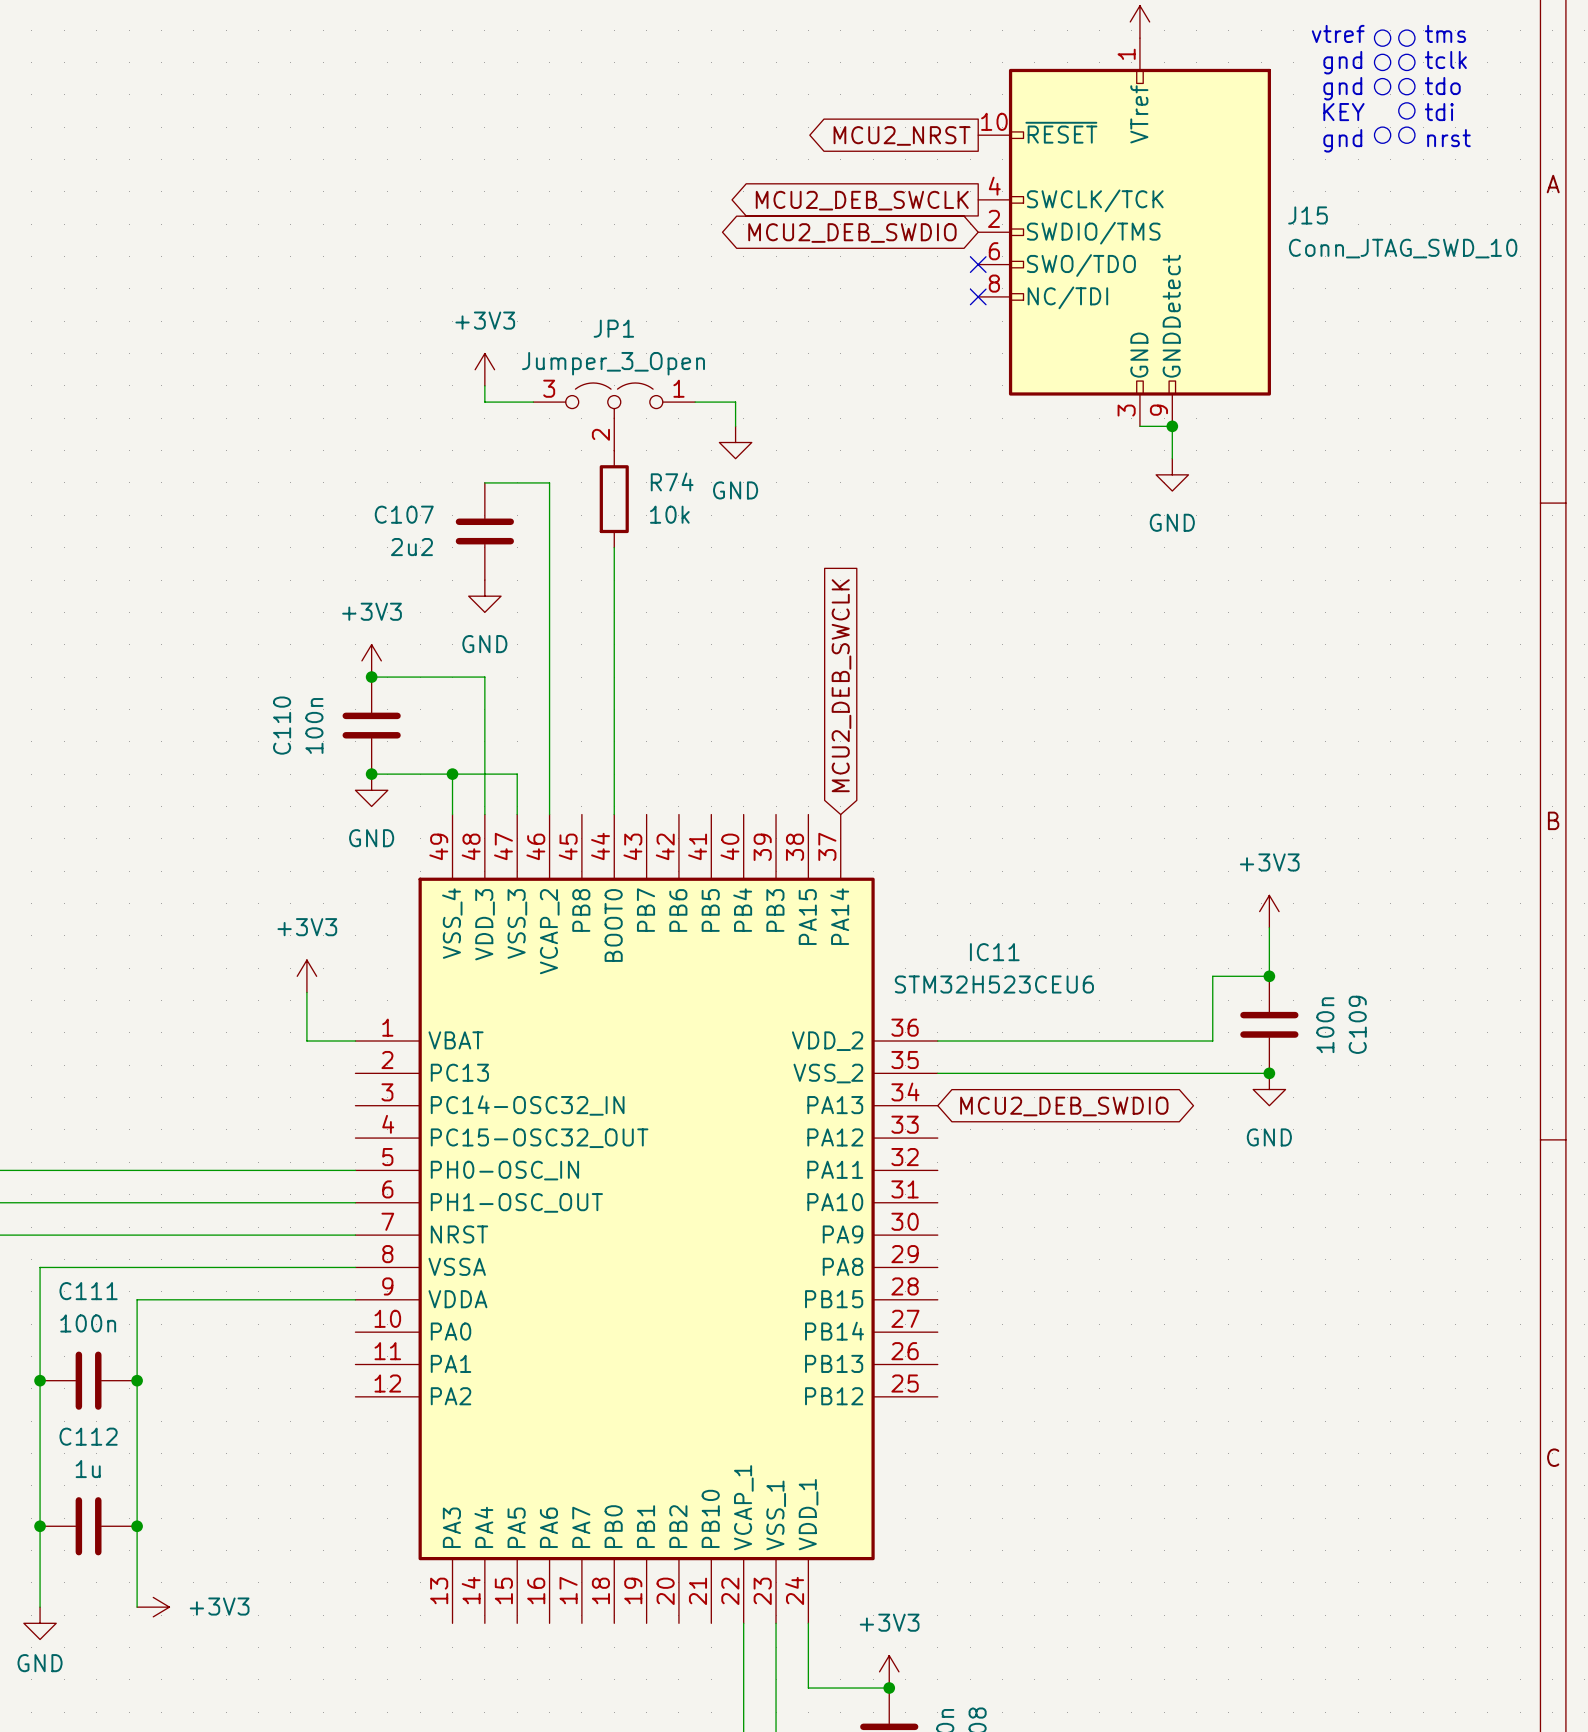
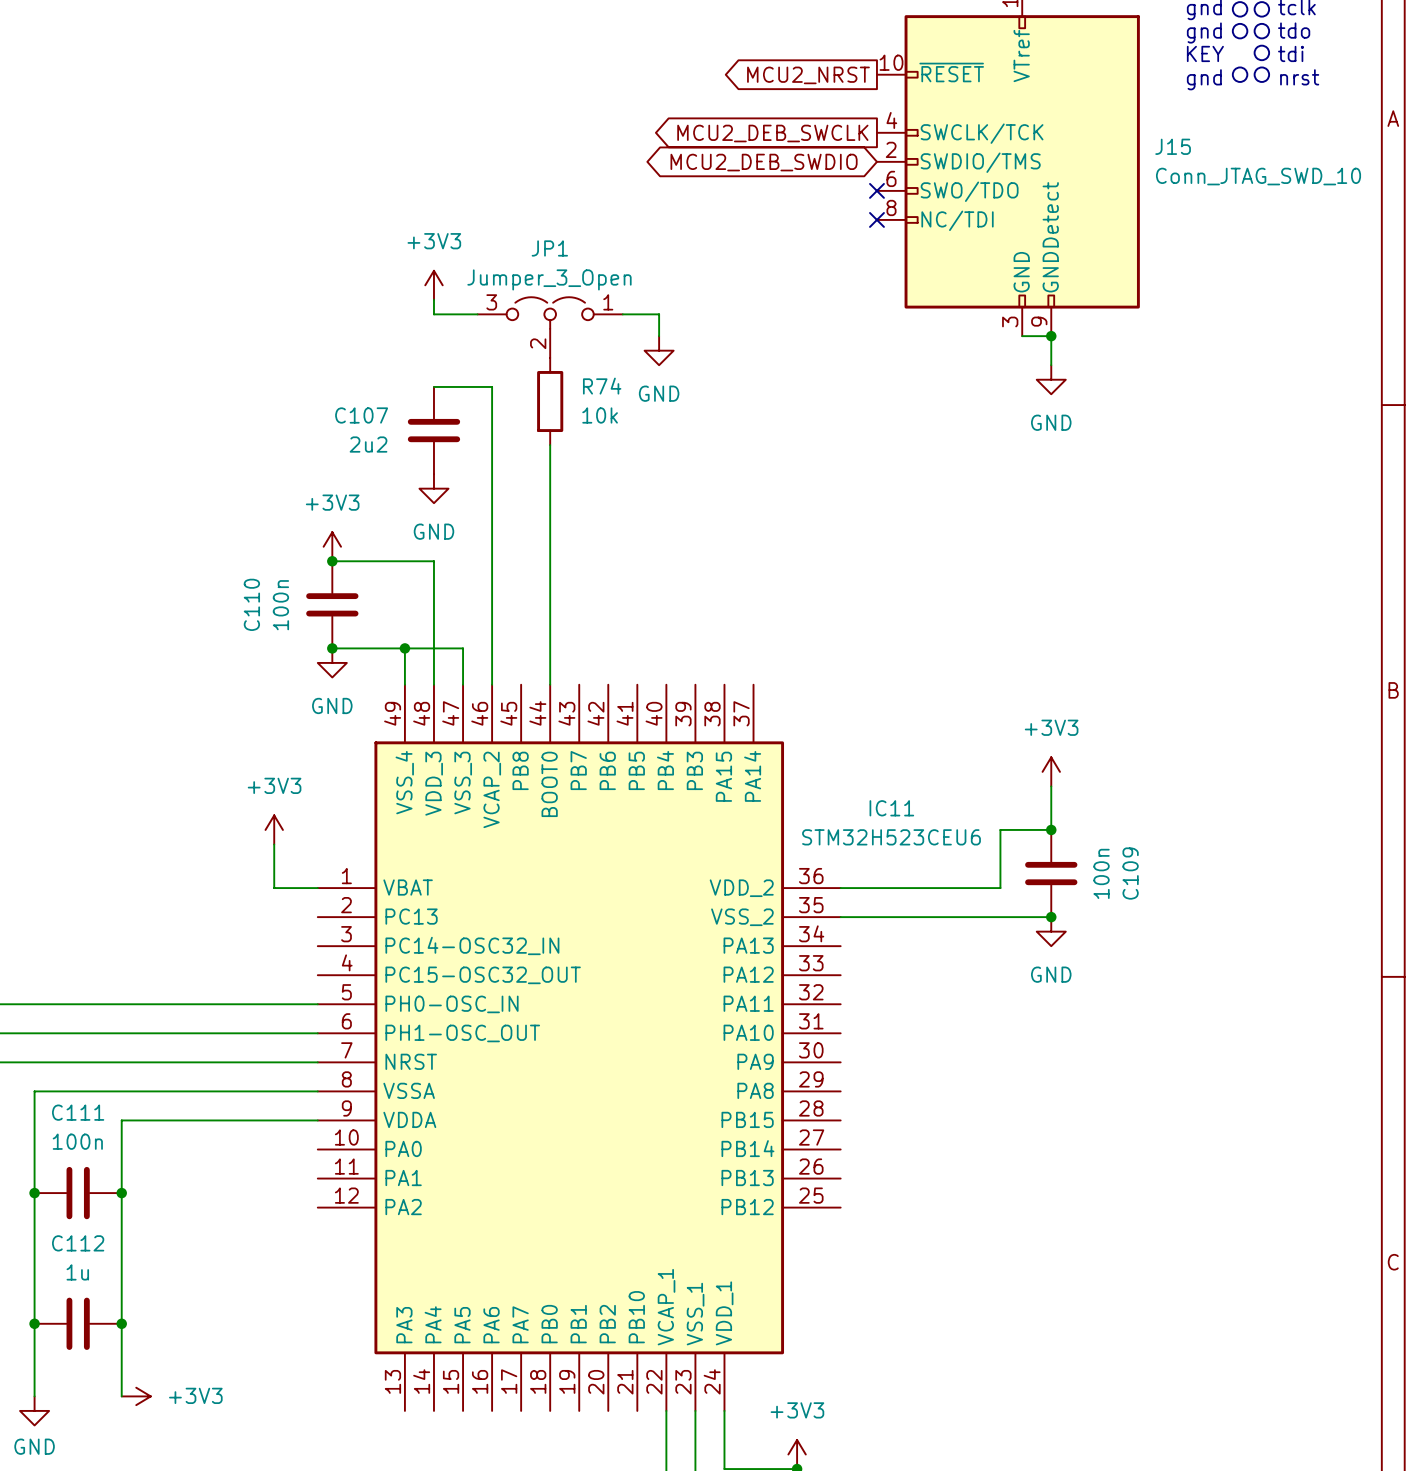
global label: MCU2_DEB_SWCLK (841, 685) -> none
power symbol position: +3V3 (1269, 911) -> +3V3 (1051, 771)
wire: (1269, 927) (1269, 976) (1212, 976) (1212, 1041) (1115, 1041) -> (1051, 786) (1051, 829) (1000, 829) (1000, 888)
junction: none -> (1051, 829)
junction: (1269, 976) -> none
C109 position: (1269, 1024) -> (1051, 873)
wire: (1172, 1073) (1269, 1073) -> none
junction: none -> (1051, 917)
junction: (1269, 1073) -> none
power symbol position: GND (1269, 1089) -> GND (1051, 931)
global label: MCU2_DEB_SWDIO (1064, 1106) -> none

